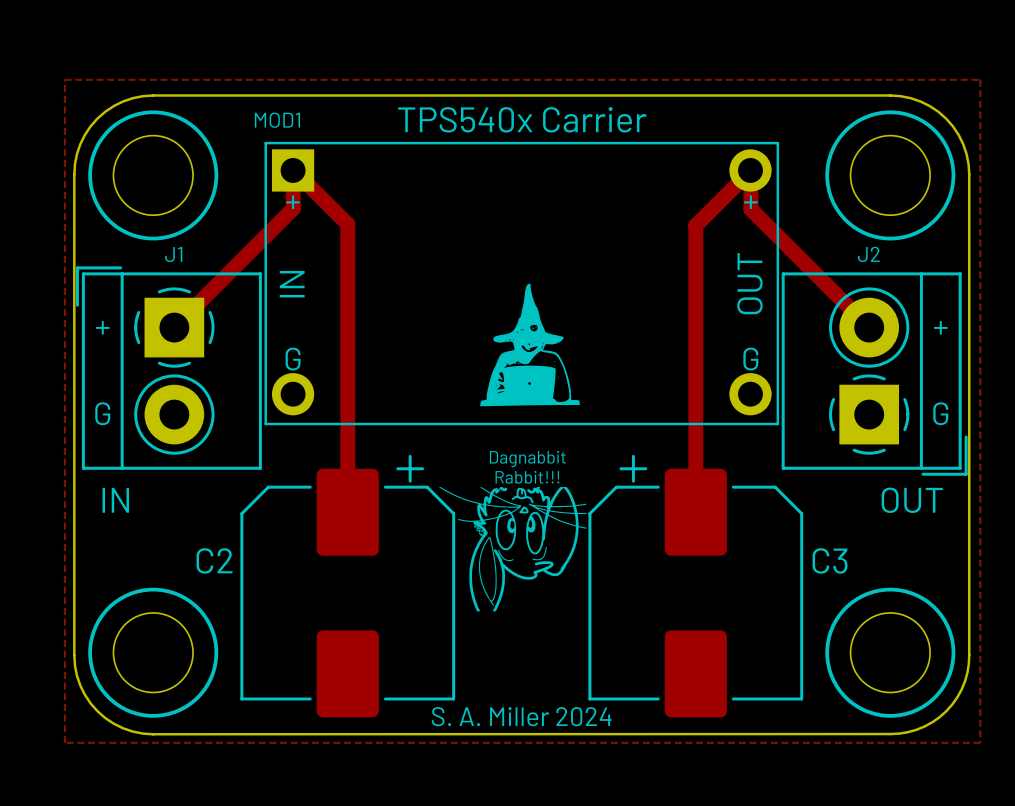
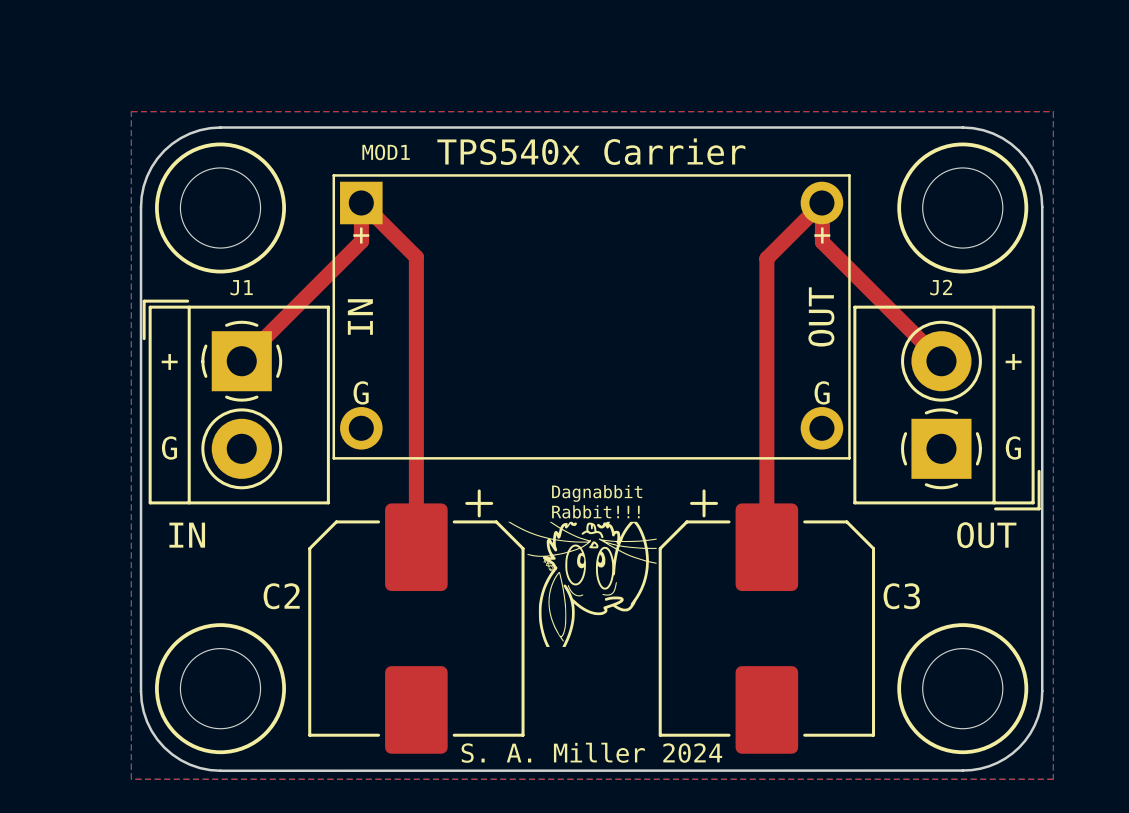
MOD1 name position: MOD1 (277, 120) -> MOD1 (386, 152)
drawing: [480, 283, 580, 407] -> none

